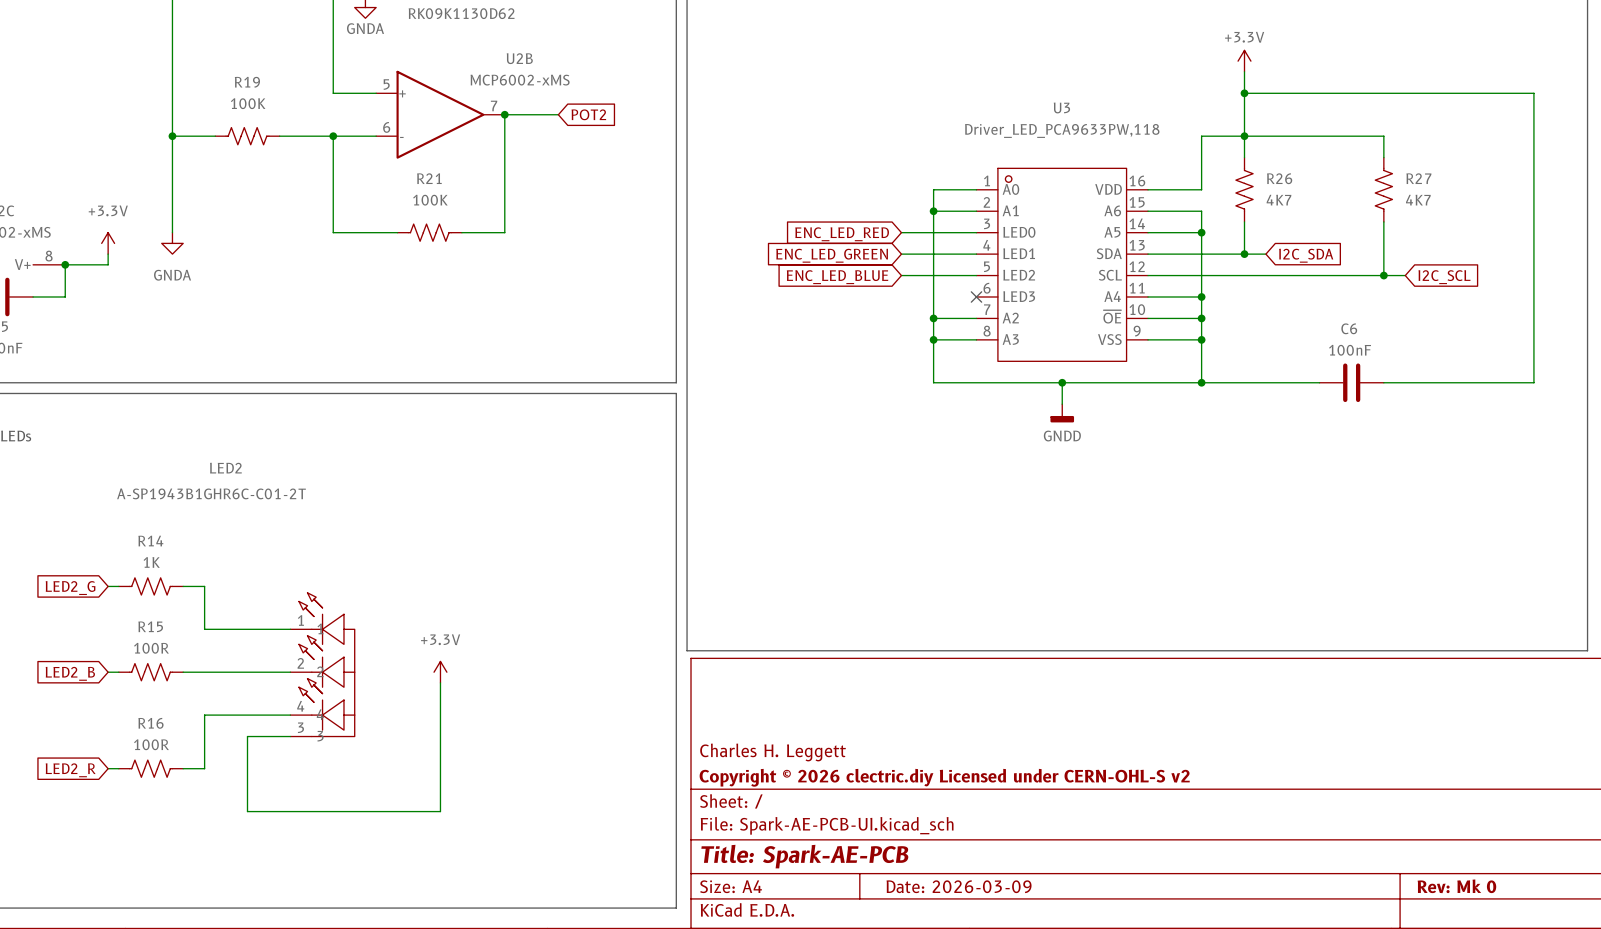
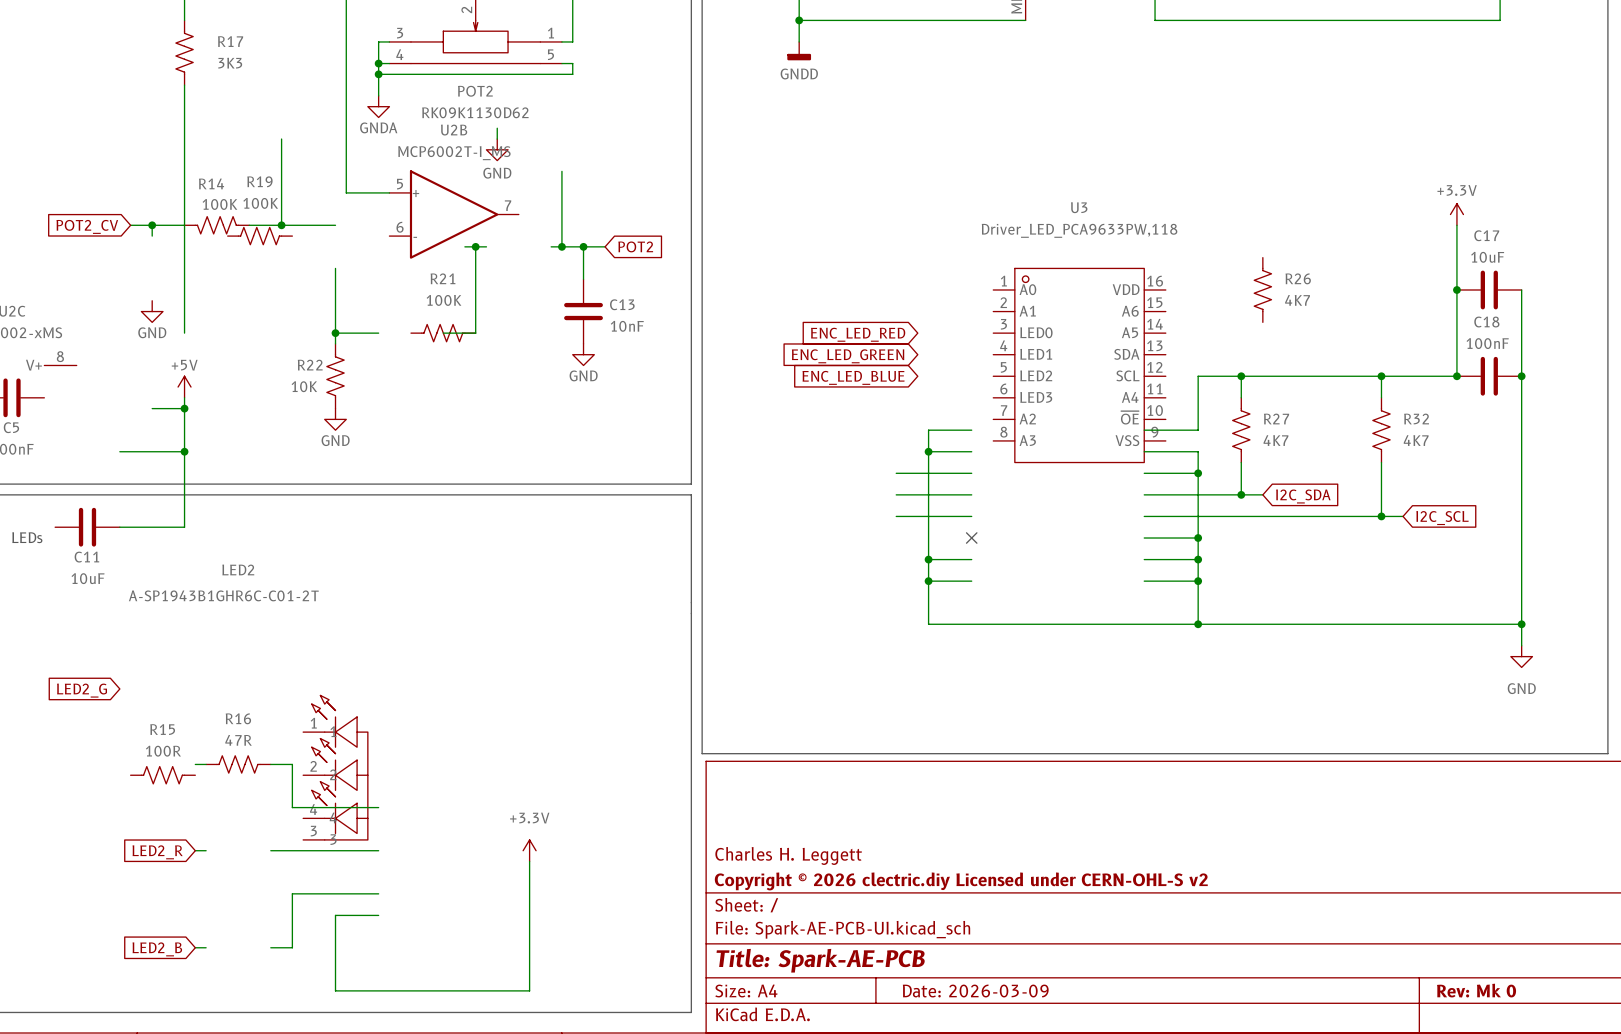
wire: none -> (497, 128) (497, 139)
wire: none -> (281, 139) (281, 225)
power symbol: none -> GND (497, 149)
U2B name position: U2B (519, 58) -> U2B (454, 130)
power symbol: +3.3V (1244, 61) -> none
wire: none -> (561, 171) (561, 246)
wire: (1244, 71) (1244, 157) -> none
U2B value: MCP6002-xMS (520, 80) -> MCP6002T-I_MS (454, 153)
wire: (1244, 93) (1533, 93) (1533, 382) (1383, 382) -> none
junction: (1244, 93) -> none
junction: (504, 114) -> none
wire: (558, 114) (504, 114) (504, 232) (461, 232) -> none
global label position: POT2 (588, 114) -> POT2 (635, 246)
power symbol: none -> +3.3V (1456, 214)
wire: none -> (130, 225) (184, 225)
wire: none -> (152, 225) (152, 236)
wire: none -> (249, 225) (335, 225)
junction: none -> (281, 225)
wire: none -> (1456, 225) (1456, 376) (1424, 376)
global label: none -> POT2_CV (87, 226)
wire: (172, 136) (215, 136) -> none
junction position: (172, 136) -> (152, 225)
wire: (279, 136) (376, 136) -> none
wire: (333, 136) (333, 232) -> (335, 333) (346, 333)
junction: (333, 136) -> none
junction: (1244, 136) -> none
wire: none -> (464, 246) (486, 246)
wire: none -> (475, 246) (475, 333) (443, 333)
junction: none -> (475, 246)
wire: none -> (551, 246) (605, 246)
junction: none -> (561, 246)
wire: none -> (583, 246) (583, 279)
junction: none -> (583, 246)
wire: (1383, 157) (1383, 136) (1201, 136) (1201, 189) (1148, 189) -> none
wire: none -> (335, 268) (335, 343)
wire: (976, 189) (933, 189) (933, 382) (1319, 382) -> none
R27 position: (1383, 189) -> (1241, 430)
junction: none -> (1456, 289)
C17: none -> 10uF (1489, 289)
wire: none -> (1521, 289) (1521, 645)
power symbol: none -> GND (152, 311)
C13: none -> 10nF (583, 311)
wire: (933, 211) (976, 211) -> (928, 451) (971, 451)
junction: (933, 211) -> none
wire: (1148, 211) (1201, 211) (1201, 382) -> (1144, 451) (1198, 451) (1198, 624)
wire: (1244, 221) (1244, 254) -> (1241, 462) (1241, 494)
wire: (1383, 221) (1383, 275) -> (1381, 462) (1381, 516)
junction: none -> (335, 333)
wire: (365, 232) (397, 232) -> none
wire: (901, 232) (976, 232) -> (896, 473) (971, 473)
wire: (1148, 232) (1201, 232) -> (1144, 473) (1198, 473)
junction: (1201, 232) -> none
power symbol: +3.3V (108, 243) -> none
power symbol: GNDA (172, 243) -> none
wire: (108, 254) (108, 264) (65, 264) (65, 296) (33, 296) -> none
power symbol: none -> GND (583, 354)
wire: (901, 254) (976, 254) -> (896, 494) (971, 494)
wire: (1148, 254) (1265, 254) -> (1144, 494) (1262, 494)
junction: (1244, 254) -> none
global label position: I2C_SDA (1306, 255) -> I2C_SDA (1303, 496)
junction: (65, 264) -> none
R22: none -> 10K (335, 376)
wire: (901, 275) (976, 275) -> (896, 516) (971, 516)
wire: (1148, 275) (1180, 275) -> (1144, 430) (1198, 430) (1198, 376)
junction: none -> (1241, 376)
wire: none -> (1381, 376) (1381, 397)
junction position: (1383, 275) -> (1381, 376)
junction: none -> (1456, 376)
C18: none -> 100nF (1489, 376)
junction: none -> (1521, 376)
global label position: I2C_SCL (1444, 277) -> I2C_SCL (1442, 518)
power symbol: none -> +5V (184, 387)
wire: none -> (184, 397) (184, 527) (119, 527)
no-connect mark: (976, 296) -> none
wire: (1148, 296) (1201, 296) -> (1144, 538) (1198, 538)
junction: (1201, 296) -> none
wire: none -> (152, 408) (184, 408)
junction: none -> (184, 408)
power symbol: none -> GND (335, 419)
wire: (933, 318) (976, 318) -> (928, 559) (971, 559)
junction: (933, 318) -> none
wire: (1148, 318) (1201, 318) -> (1144, 559) (1198, 559)
junction: (1201, 318) -> none
wire: none -> (971, 430) (928, 430) (928, 624) (1521, 624)
R32: none -> 4K7 (1381, 430)
wire: (933, 339) (976, 339) -> (928, 581) (971, 581)
junction: (933, 339) -> none
wire: (1148, 339) (1201, 339) -> (1144, 581) (1198, 581)
junction: (1201, 339) -> none
wire: none -> (119, 451) (184, 451)
junction: none -> (184, 451)
junction: none -> (928, 451)
junction: none -> (1198, 473)
wire: (1062, 382) (1062, 404) -> (1241, 376) (1241, 397)
junction: (1062, 382) -> none
junction: (1201, 382) -> none
C6: 100nF (1351, 382) -> none
junction: none -> (1241, 494)
power symbol: GNDD (1062, 413) -> none
wire: none -> (1144, 516) (1403, 516)
junction: none -> (1381, 516)
C11: none -> 10uF (87, 527)
no-connect mark: none -> (971, 538)
junction: none -> (1198, 538)
junction: none -> (928, 559)
junction: none -> (1198, 559)
junction: none -> (928, 581)
junction: none -> (1198, 581)
junction: none -> (1198, 624)
junction: none -> (1521, 624)
power symbol: none -> GND (1521, 656)
R14 value: 1K (151, 562) -> 100K (219, 204)
wire: (108, 586) (118, 586) -> (195, 764) (206, 764)
R14 flip: as is (151, 586) -> left-right (216, 225)
R14 position: (151, 586) -> (216, 225)
wire: (183, 586) (204, 586) (204, 629) (290, 629) -> (270, 764) (292, 764) (292, 807) (378, 807)
wire: (108, 672) (118, 672) -> (195, 850) (206, 850)
wire: (183, 672) (290, 672) -> (270, 850) (378, 850)
power symbol position: +3.3V (440, 672) -> +3.3V (529, 850)
global label position: LED2_B (70, 673) -> LED2_B (157, 949)
wire: (440, 682) (440, 811) (365, 811) -> none
wire: (290, 715) (204, 715) (204, 768) (183, 768) -> (378, 893) (292, 893) (292, 947) (270, 947)
wire: (290, 736) (247, 736) (247, 811) (322, 811) -> (529, 861) (529, 990) (335, 990) (335, 915)
R16 value: 100R (151, 744) -> 47R (238, 740)
wire: (108, 768) (118, 768) -> (195, 947) (206, 947)
R16 position: (151, 768) -> (238, 764)
global label position: LED2_R (70, 770) -> LED2_R (157, 852)

